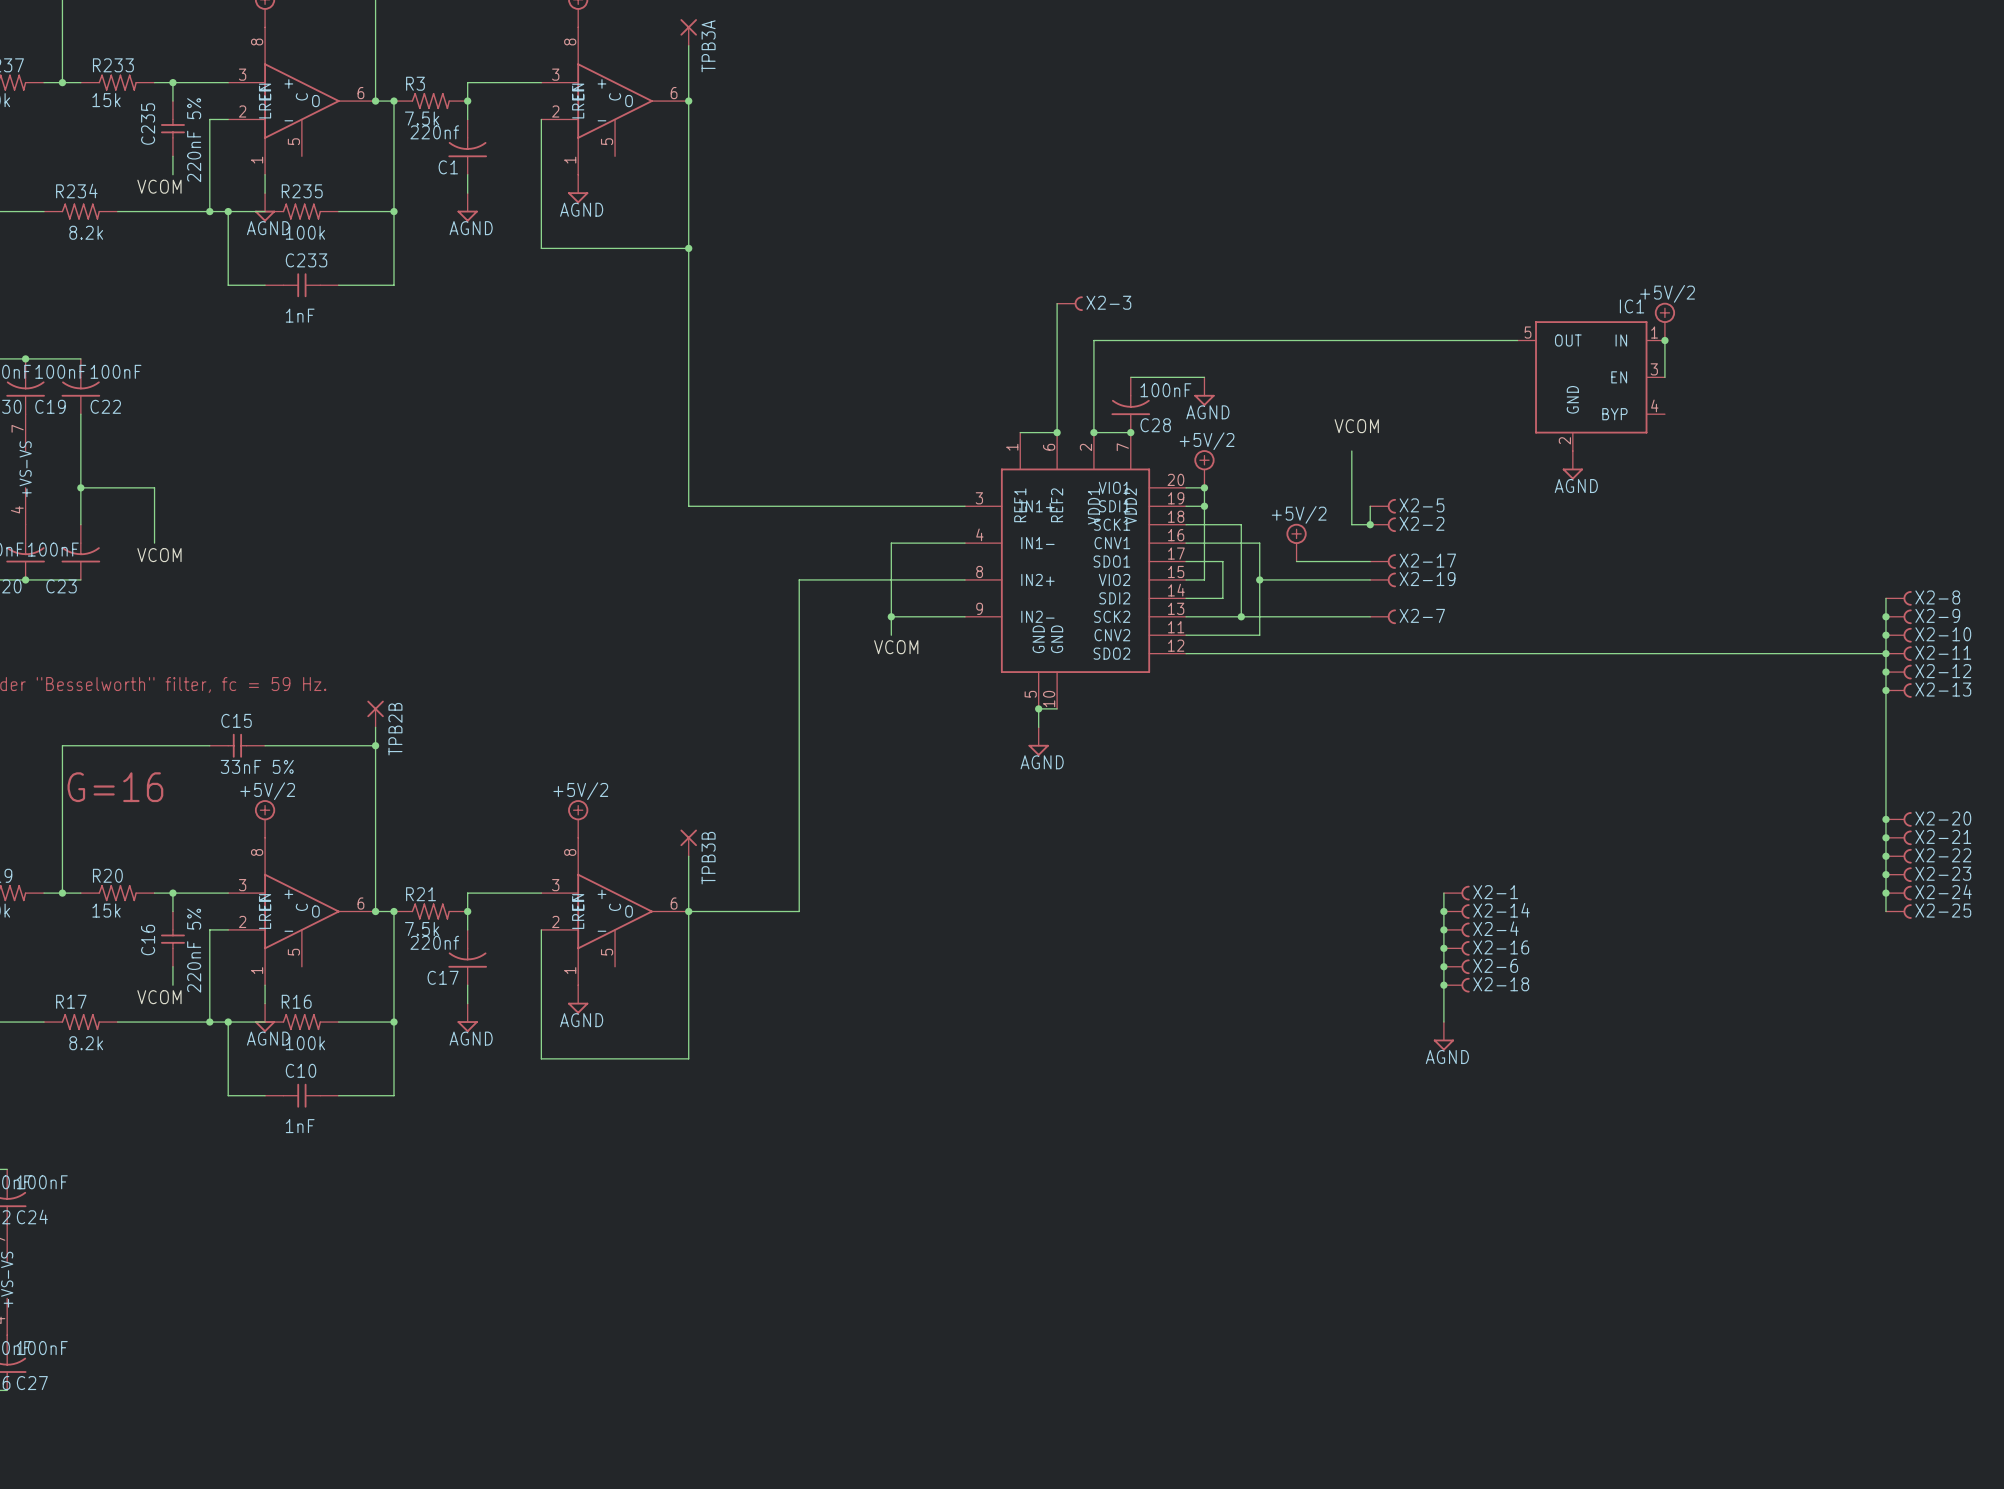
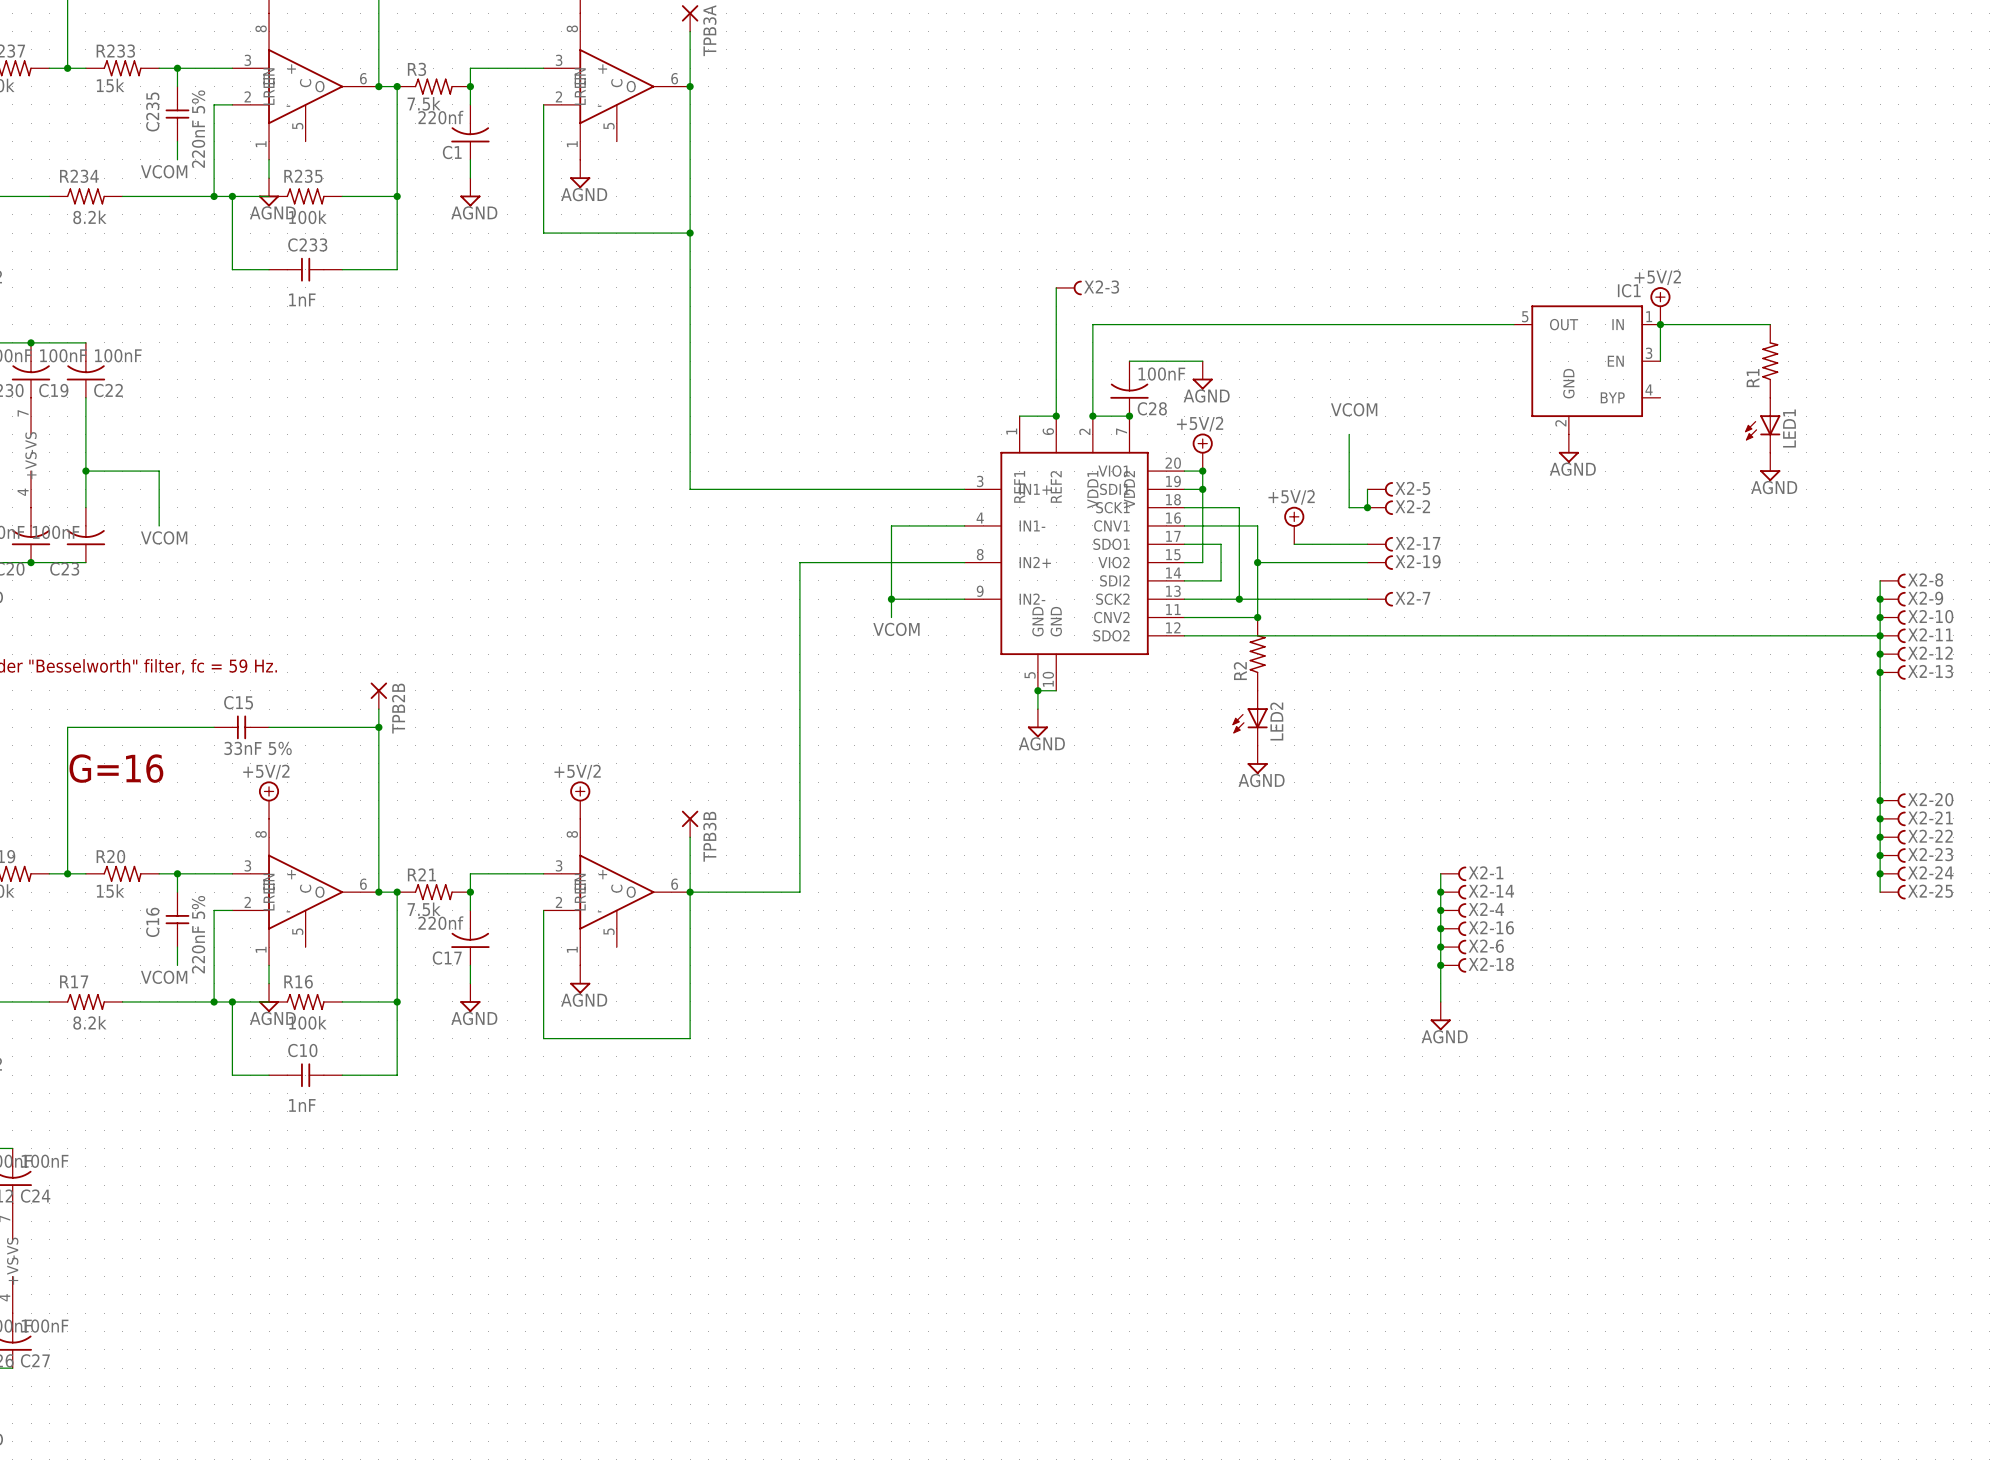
wire: none -> (1660, 324) (1770, 324)
R1: none -> (1770, 361)
LED1: none -> (1762, 425)
power symbol: none -> AGND (1770, 466)
junction: none -> (1257, 617)
R2: none -> (1257, 654)
LED2: none -> (1250, 718)
power symbol: none -> AGND (1257, 759)

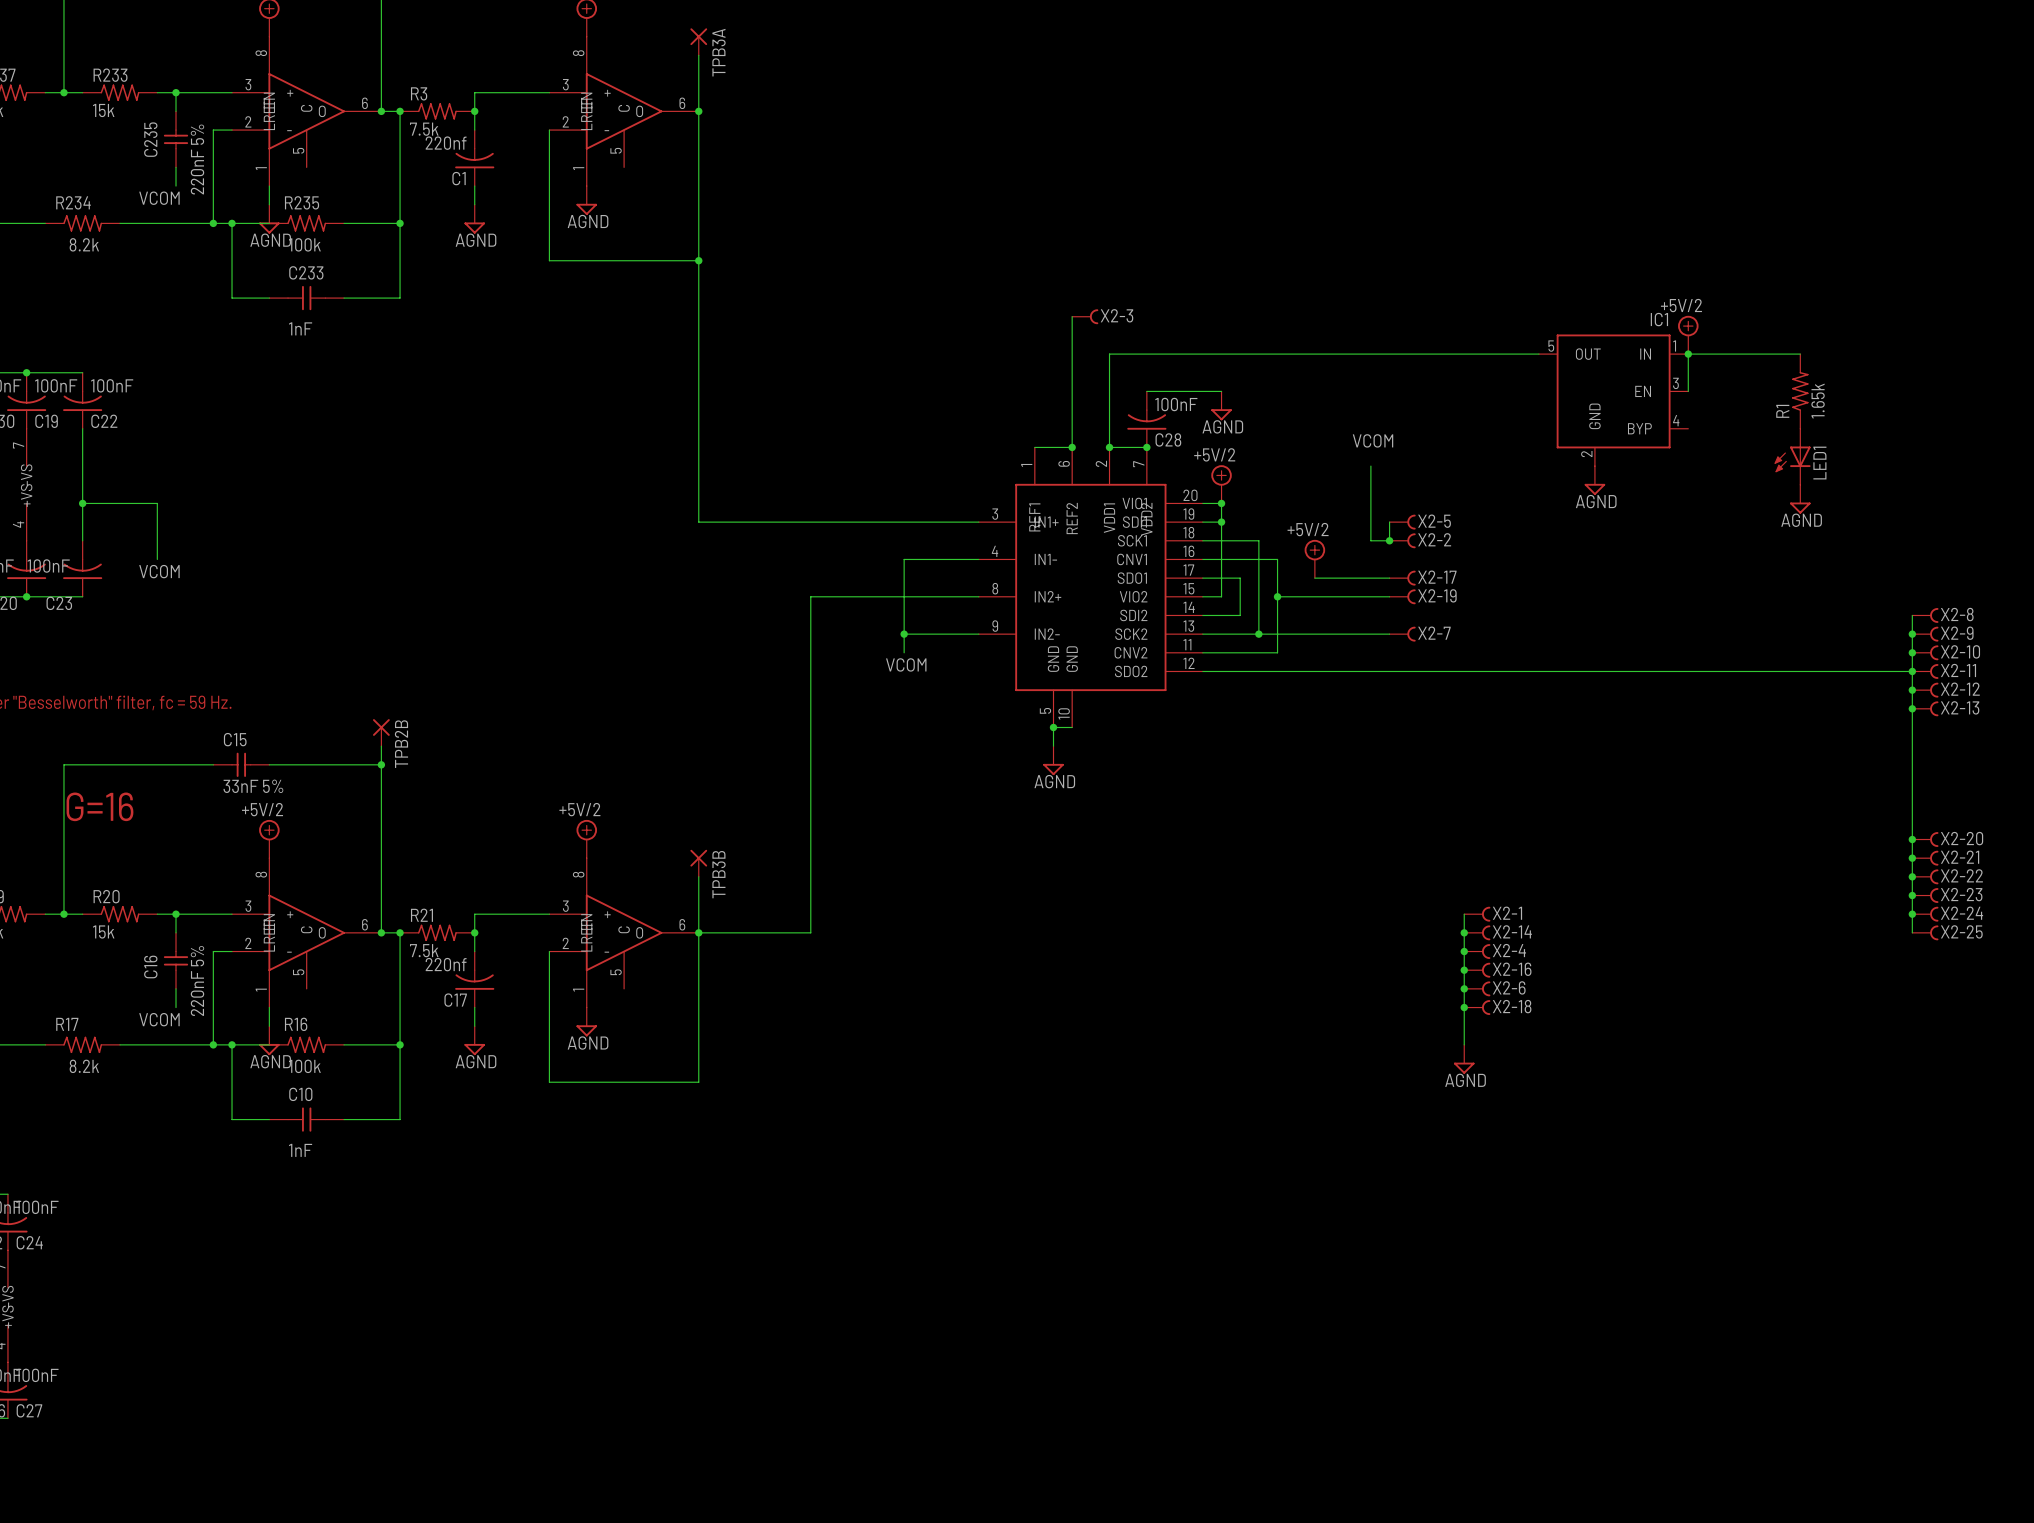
R1 value: none -> 1.65k (1818, 401)
junction: (1257, 617) -> none
R2: (1257, 654) -> none
LED2: (1250, 718) -> none
power symbol: AGND (1257, 759) -> none

